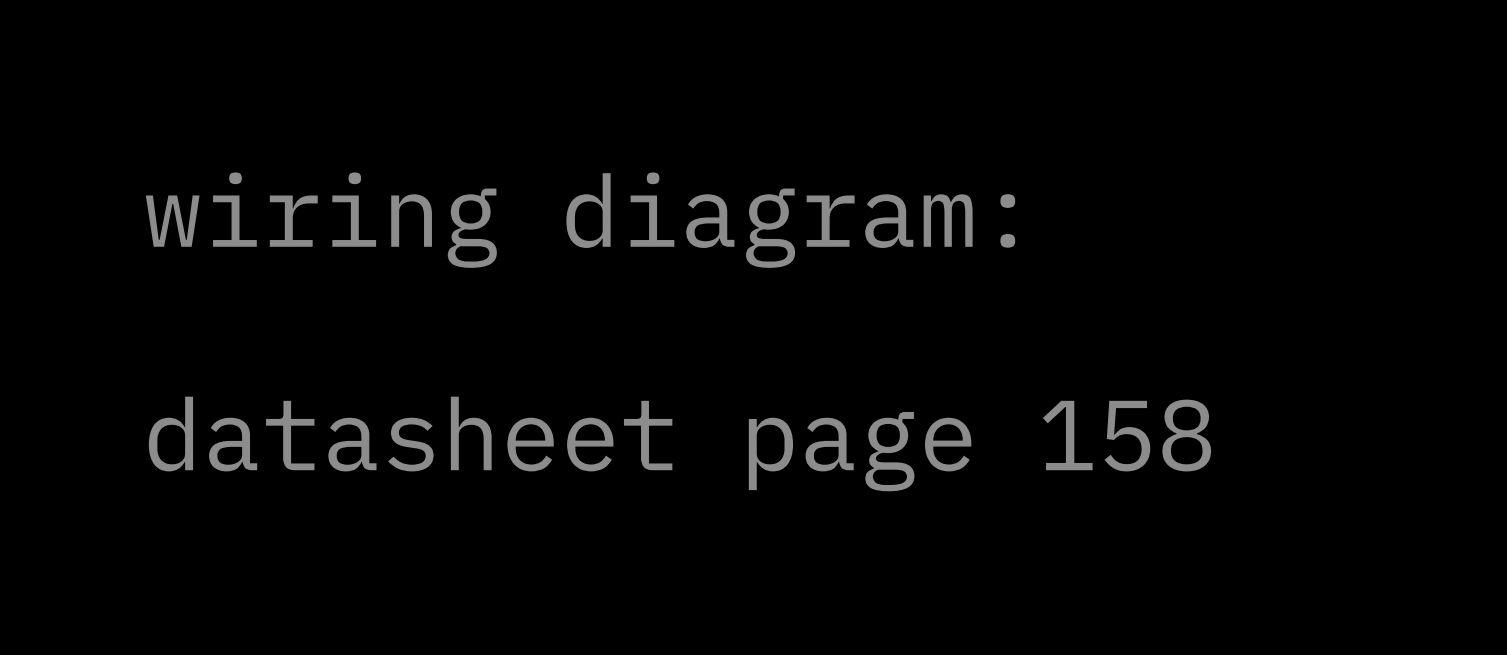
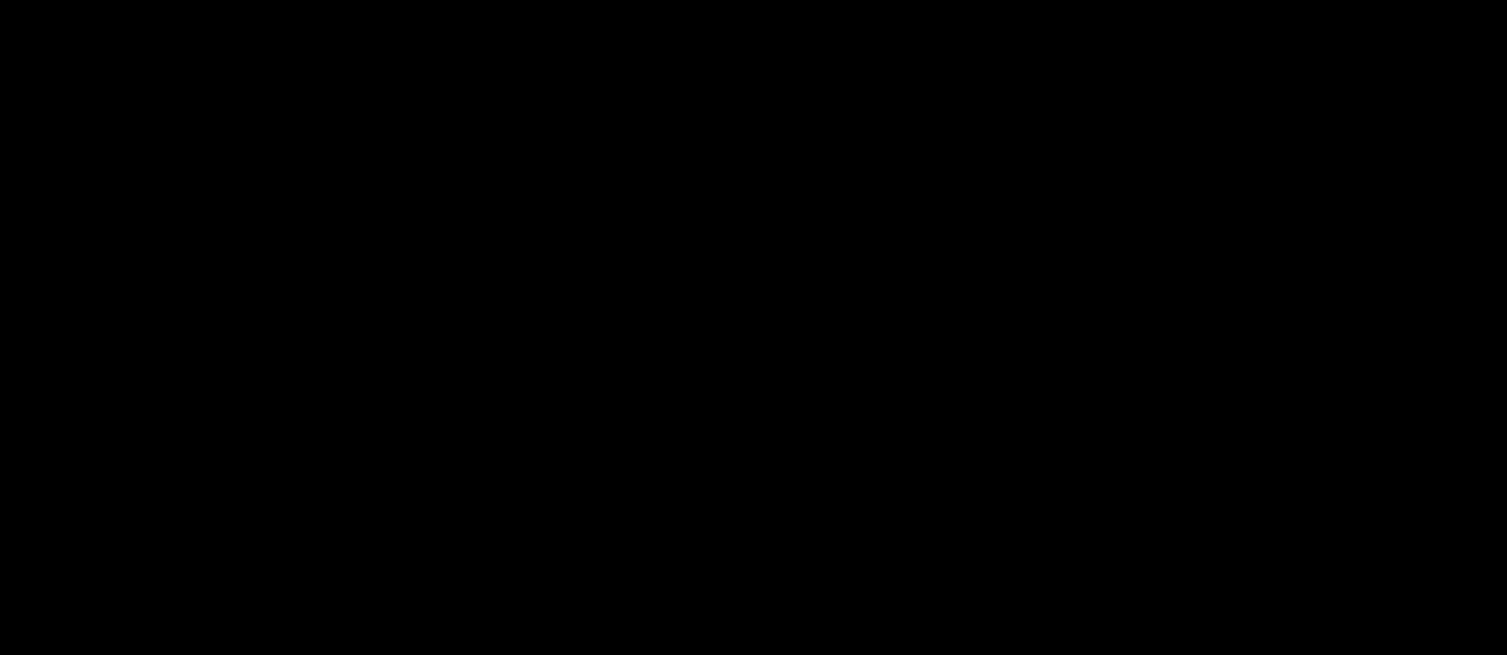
text: wiring diagram: (580, 220) -> none
text: datasheet page 158 (679, 443) -> none

